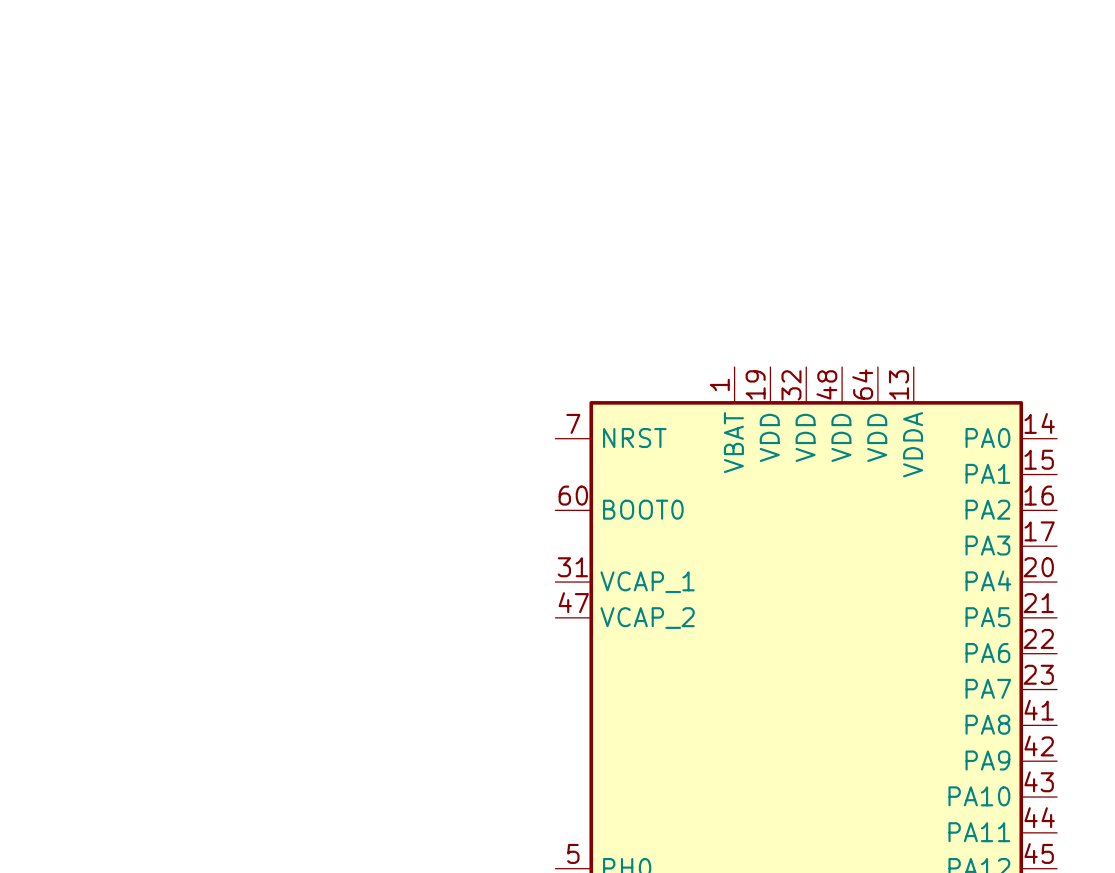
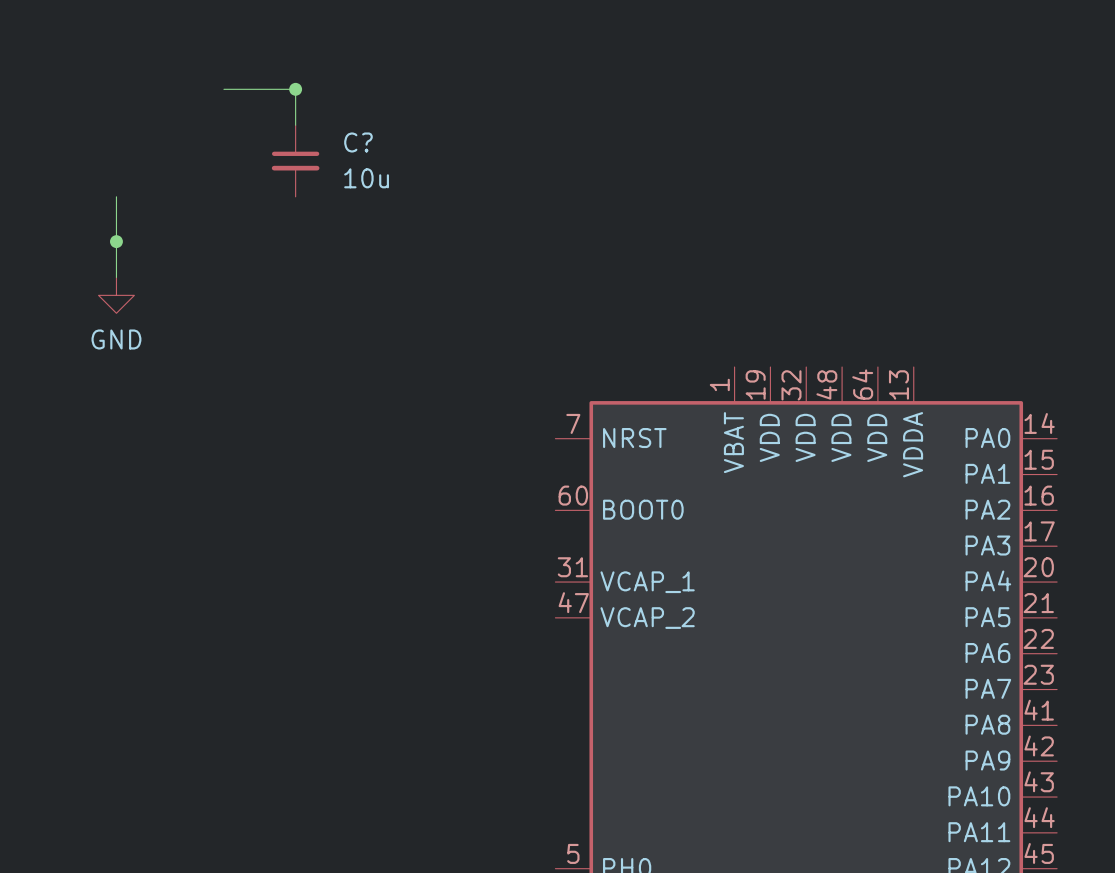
wire: none -> (223, 89) (295, 89) (295, 125)
junction: none -> (295, 89)
C?: none -> 10u (295, 160)
wire: none -> (116, 196) (116, 277)
junction: none -> (116, 241)
power symbol: none -> GND (116, 295)

